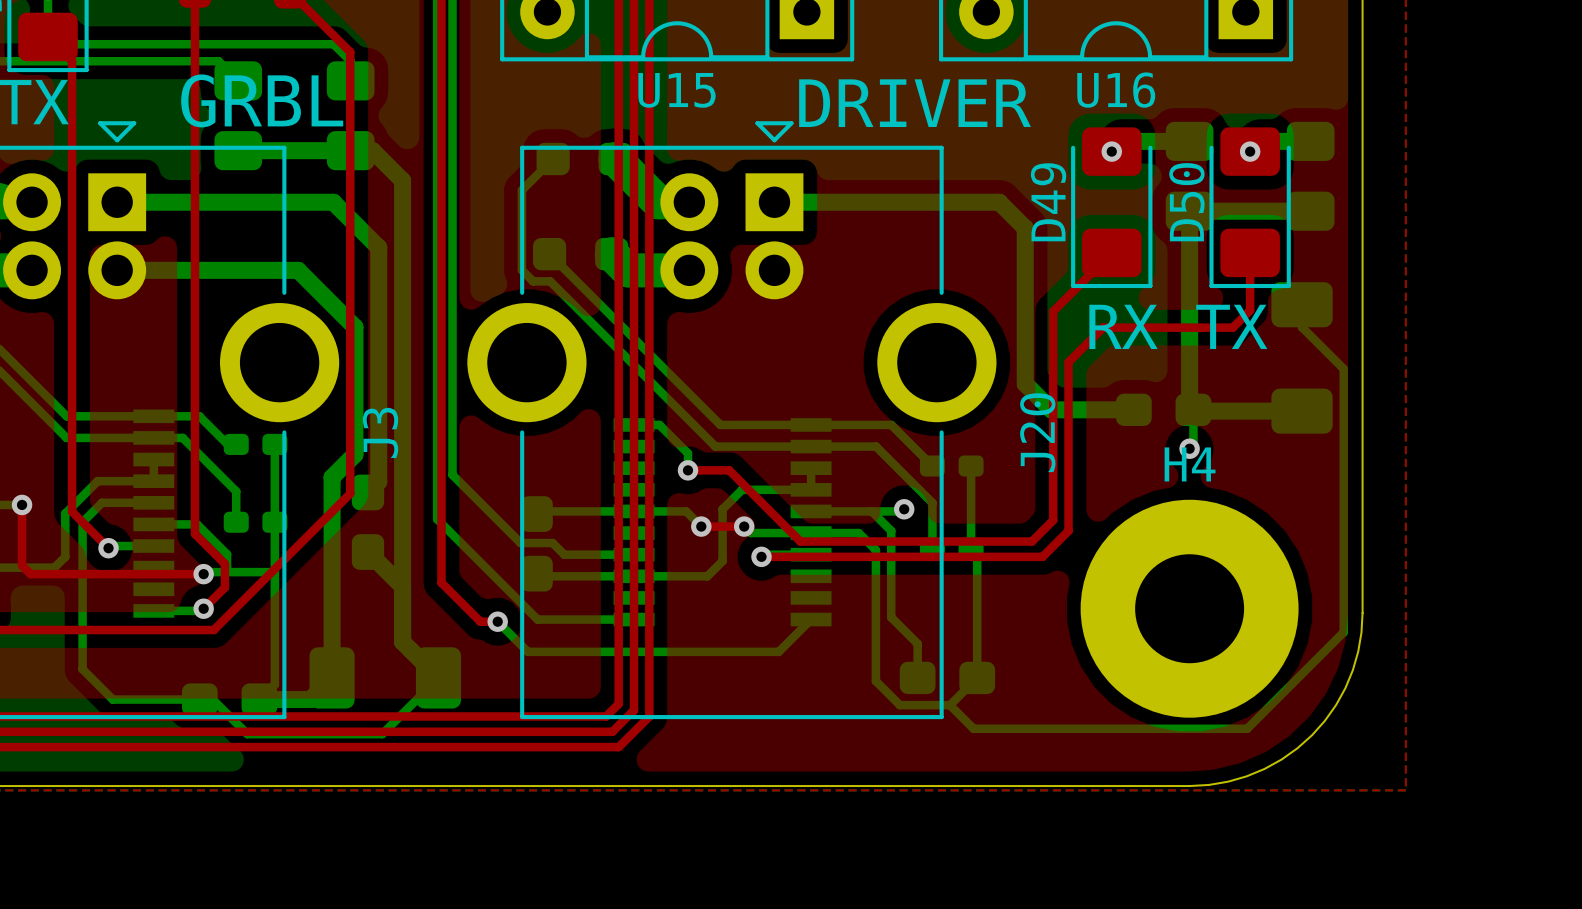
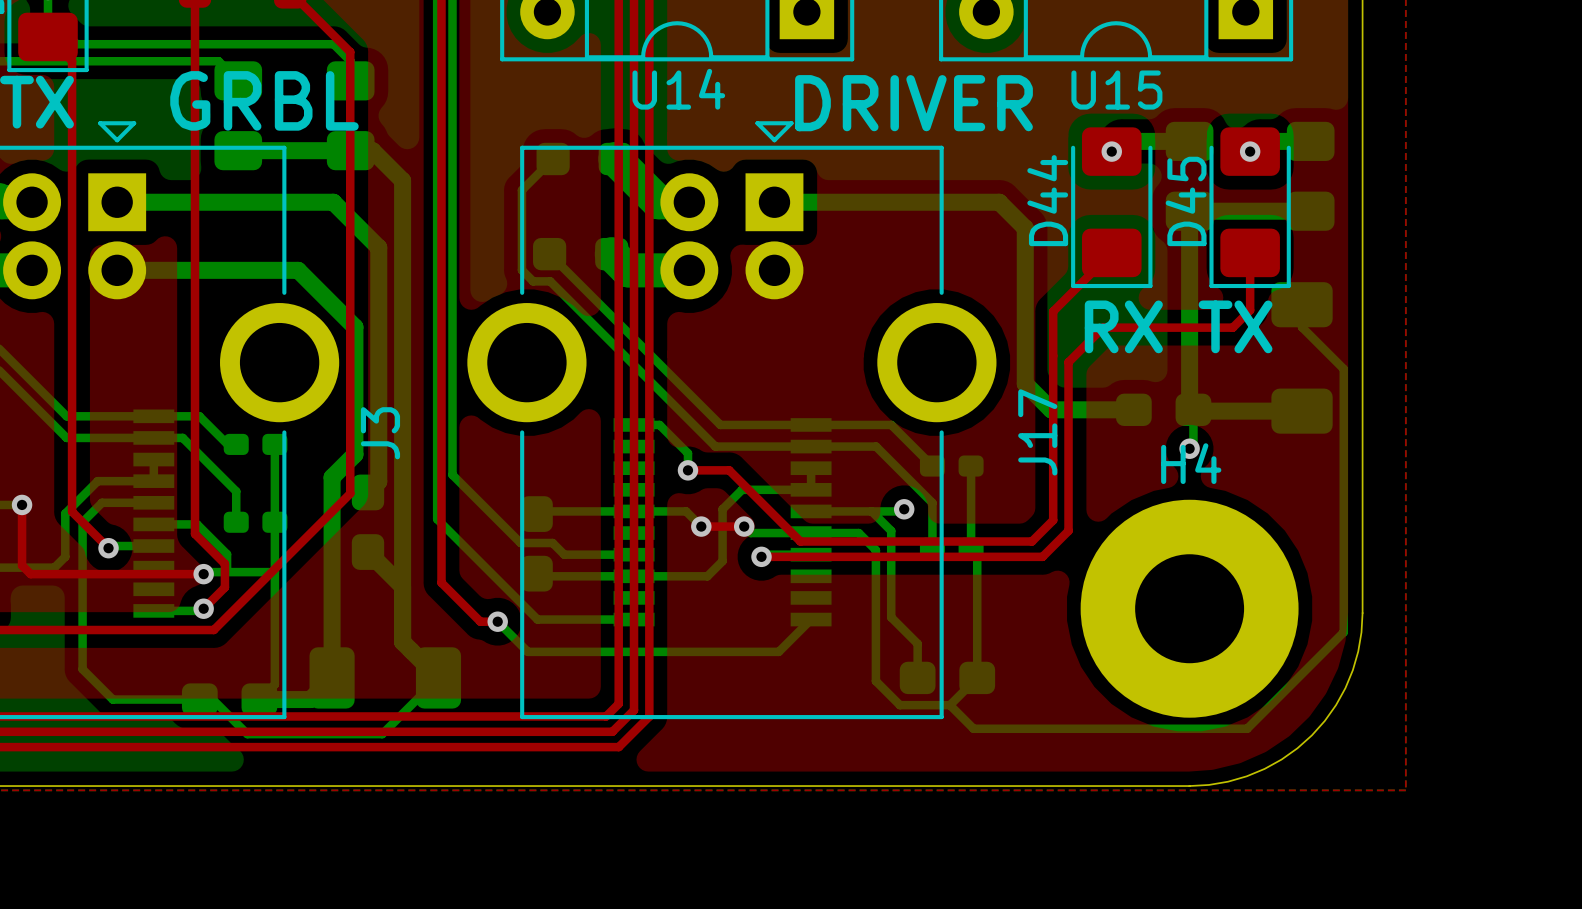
U15 name: U15 (676, 90) -> U14 (678, 89)
U16 name: U16 (1116, 90) -> U15 (1116, 90)
D49 name: D49 (1048, 202) -> D44 (1047, 200)
D50 name: D50 (1186, 202) -> D45 (1186, 201)
J20 name: J20 (1037, 432) -> J17 (1037, 432)

